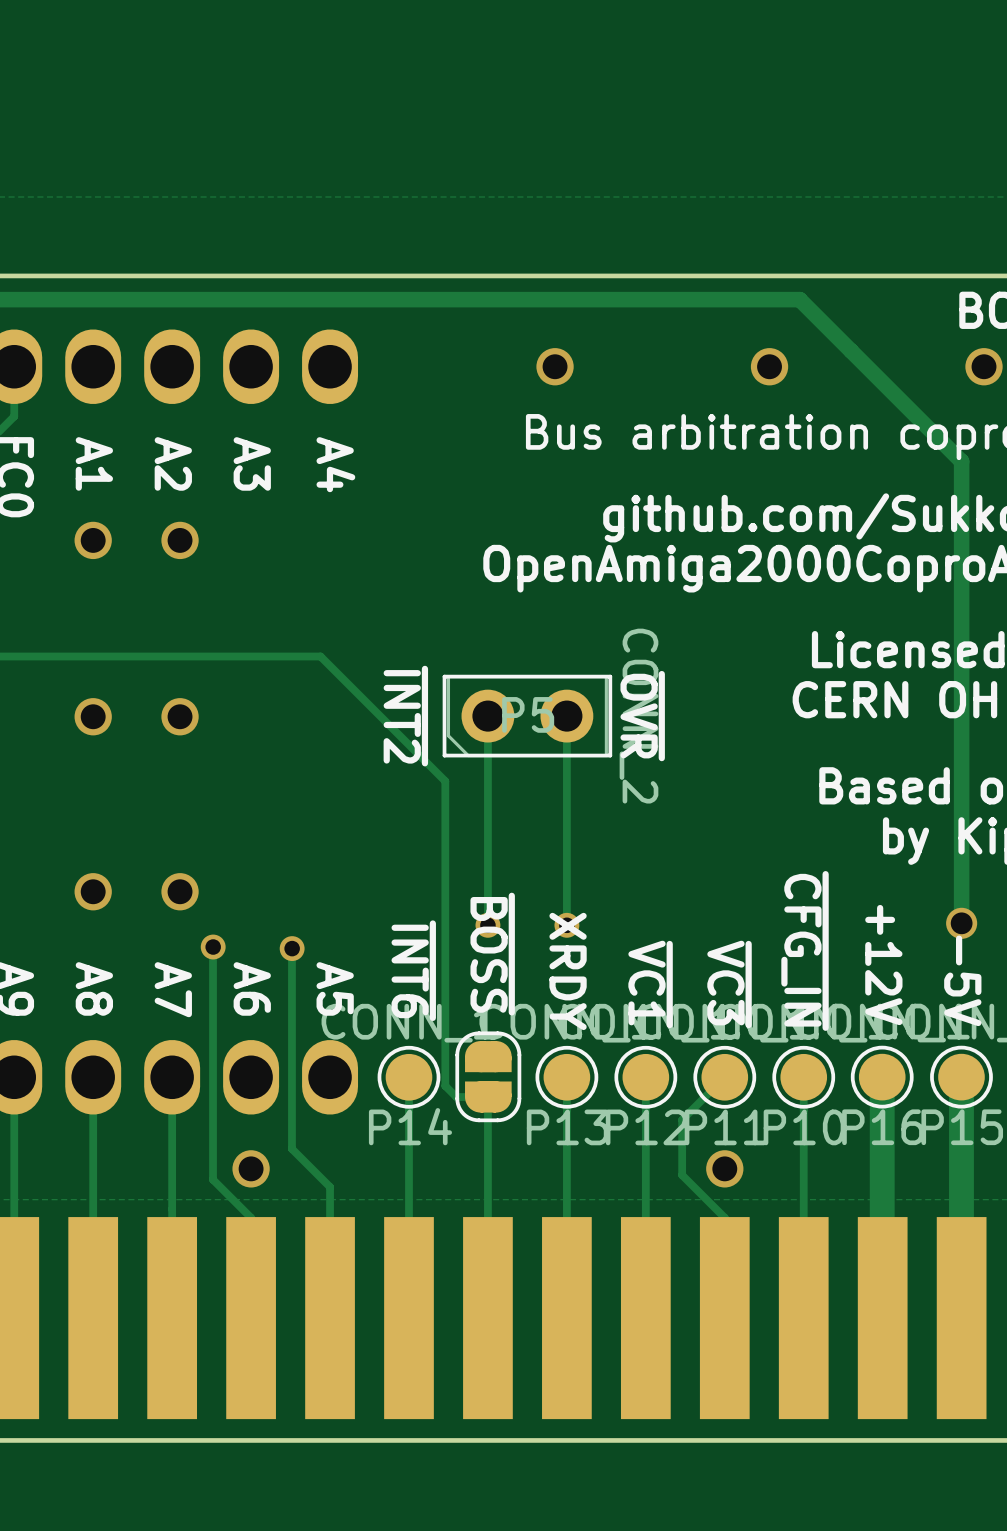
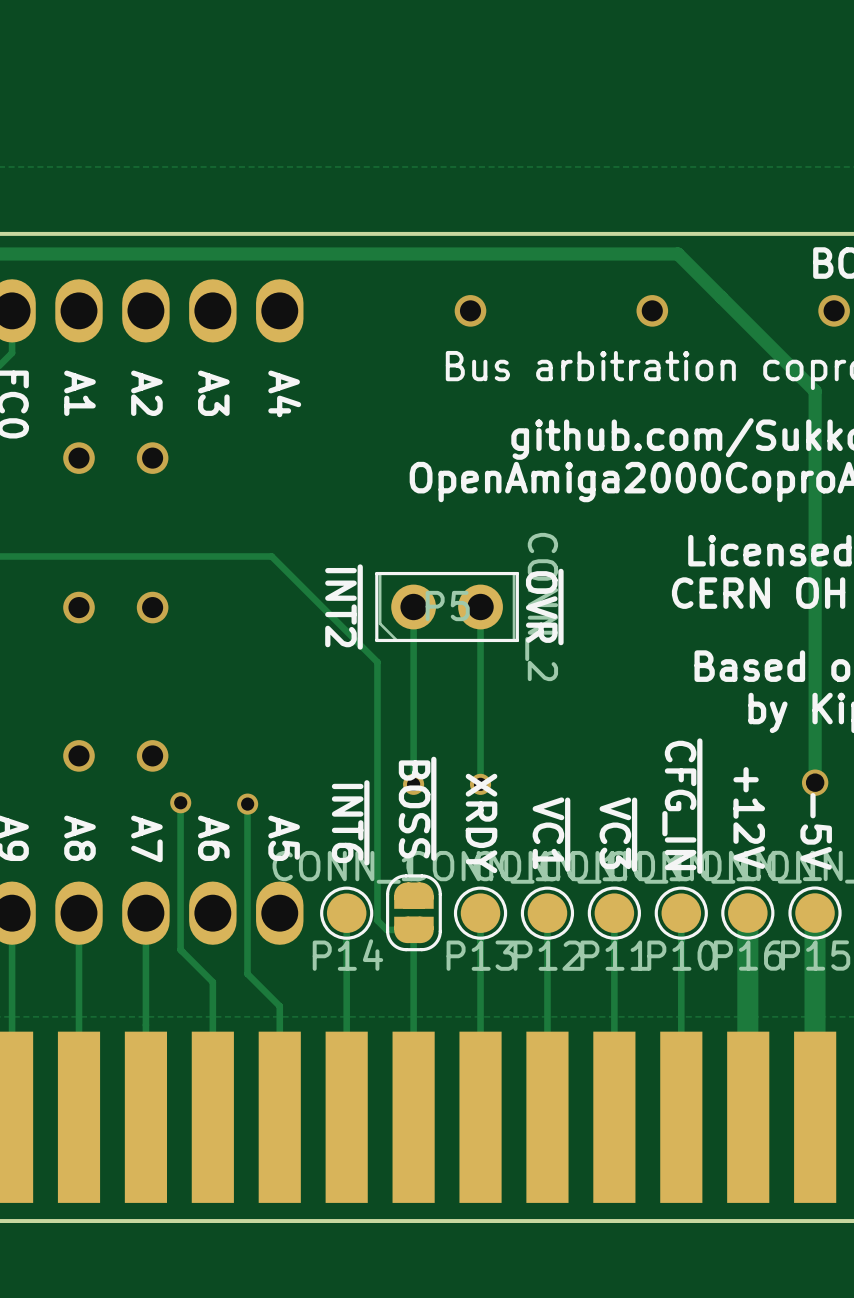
track: (724, 1077) (682, 1119) (682, 1175) (724, 1217) -> (614, 913) (614, 1032)
track: (213, 1120) (213, 1179) (251, 1217) -> (180, 949) (212, 982) (212, 1032)
via: (251, 1168) -> none
via: (724, 1168) -> none

